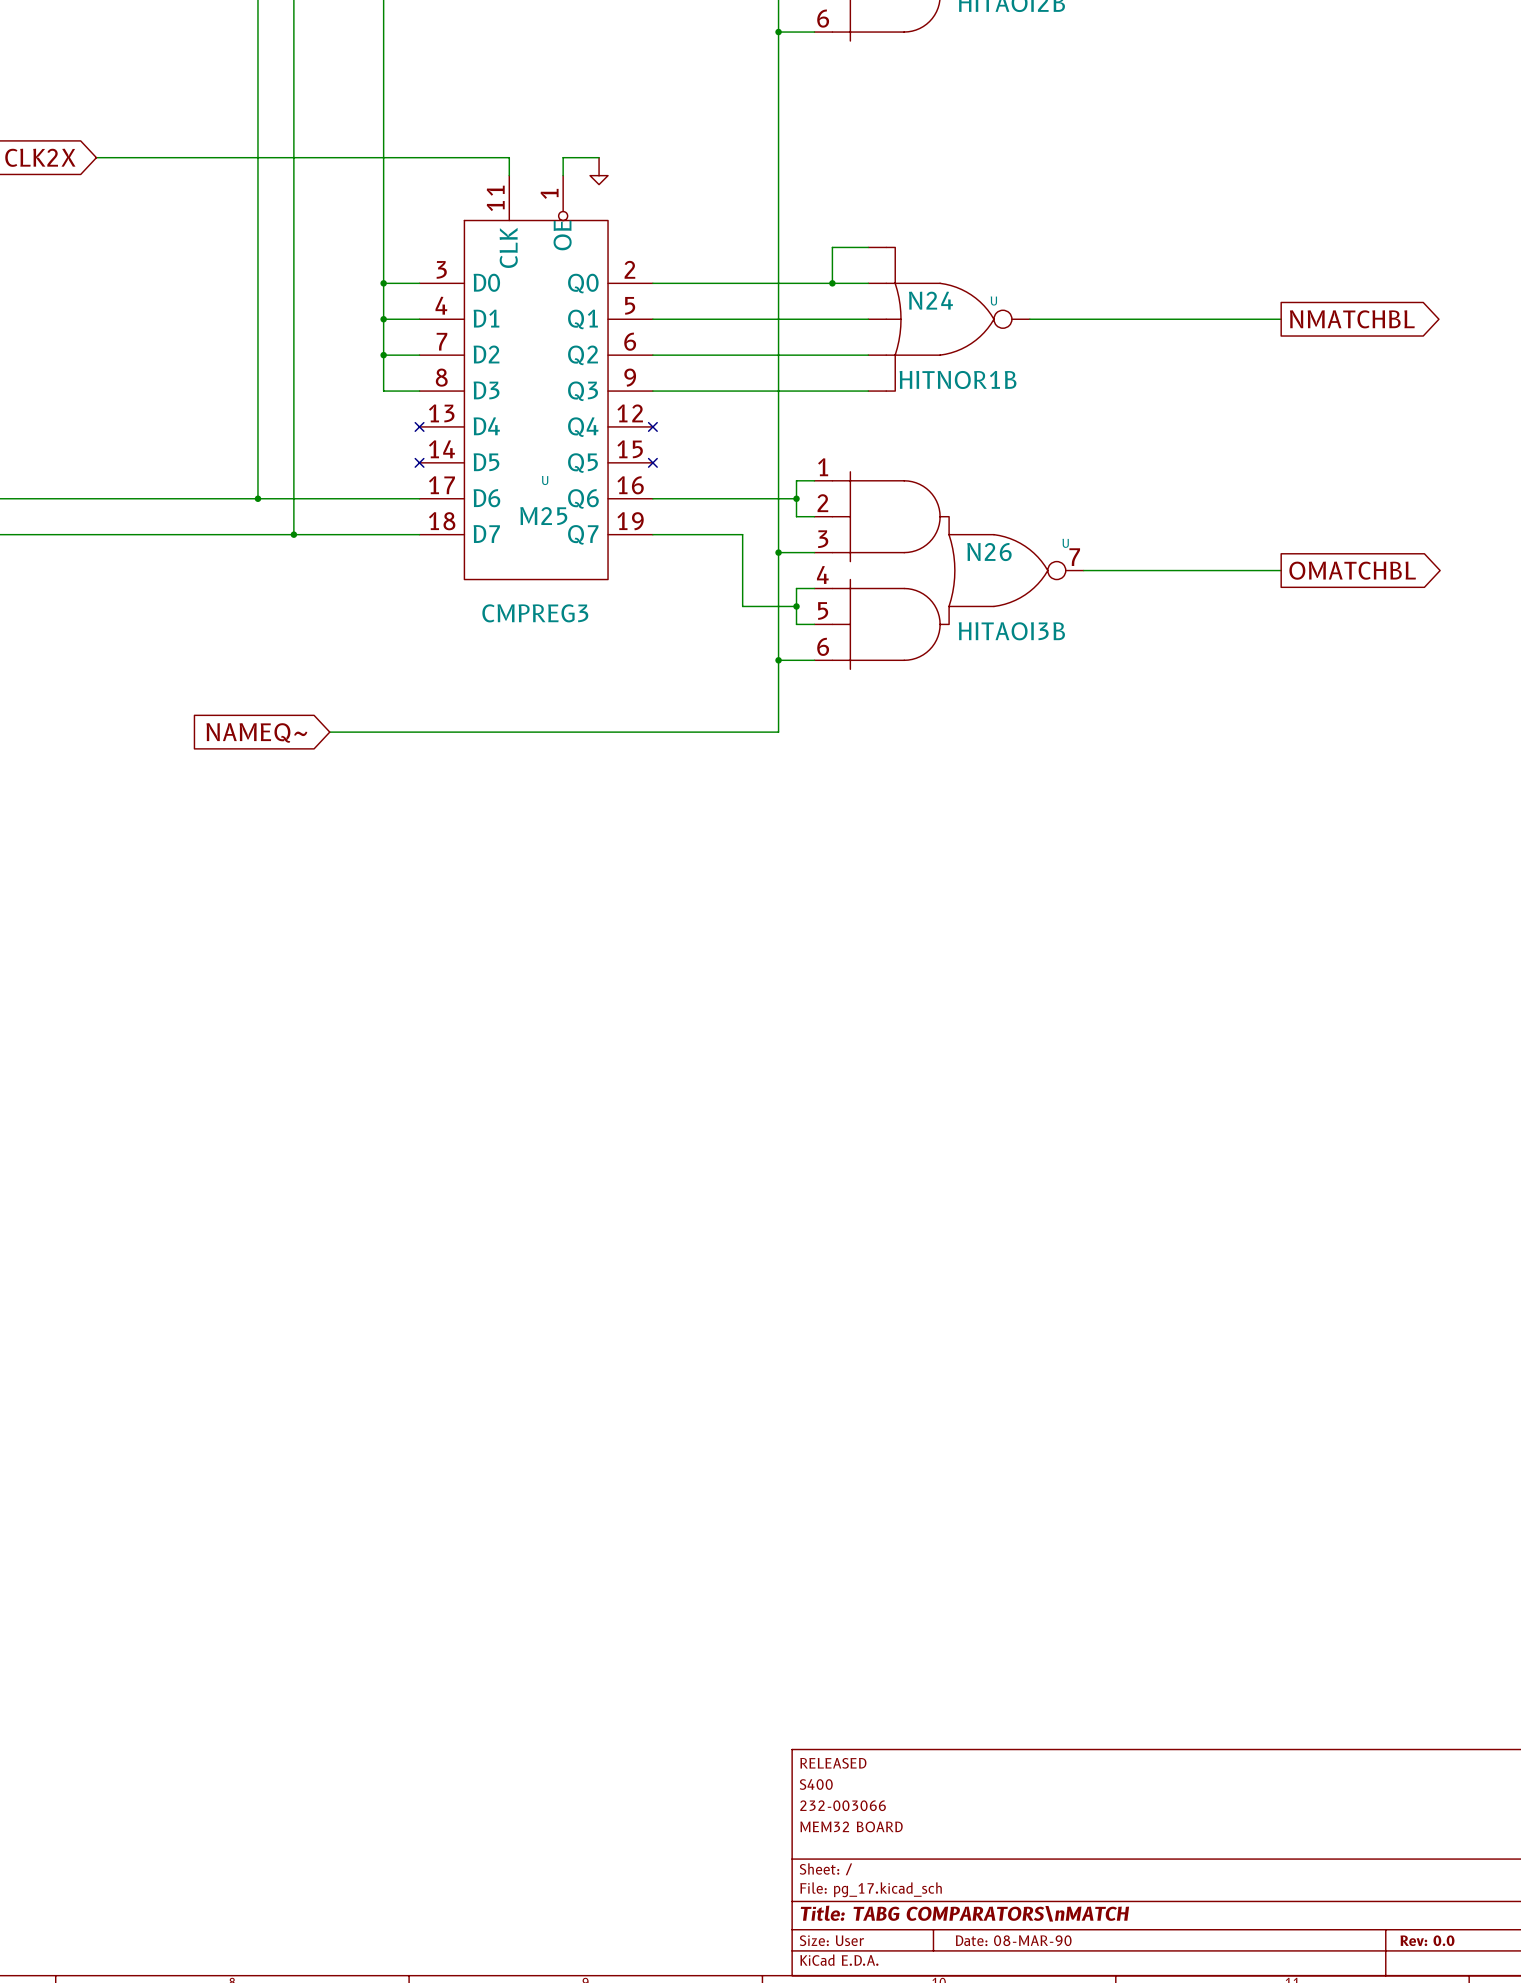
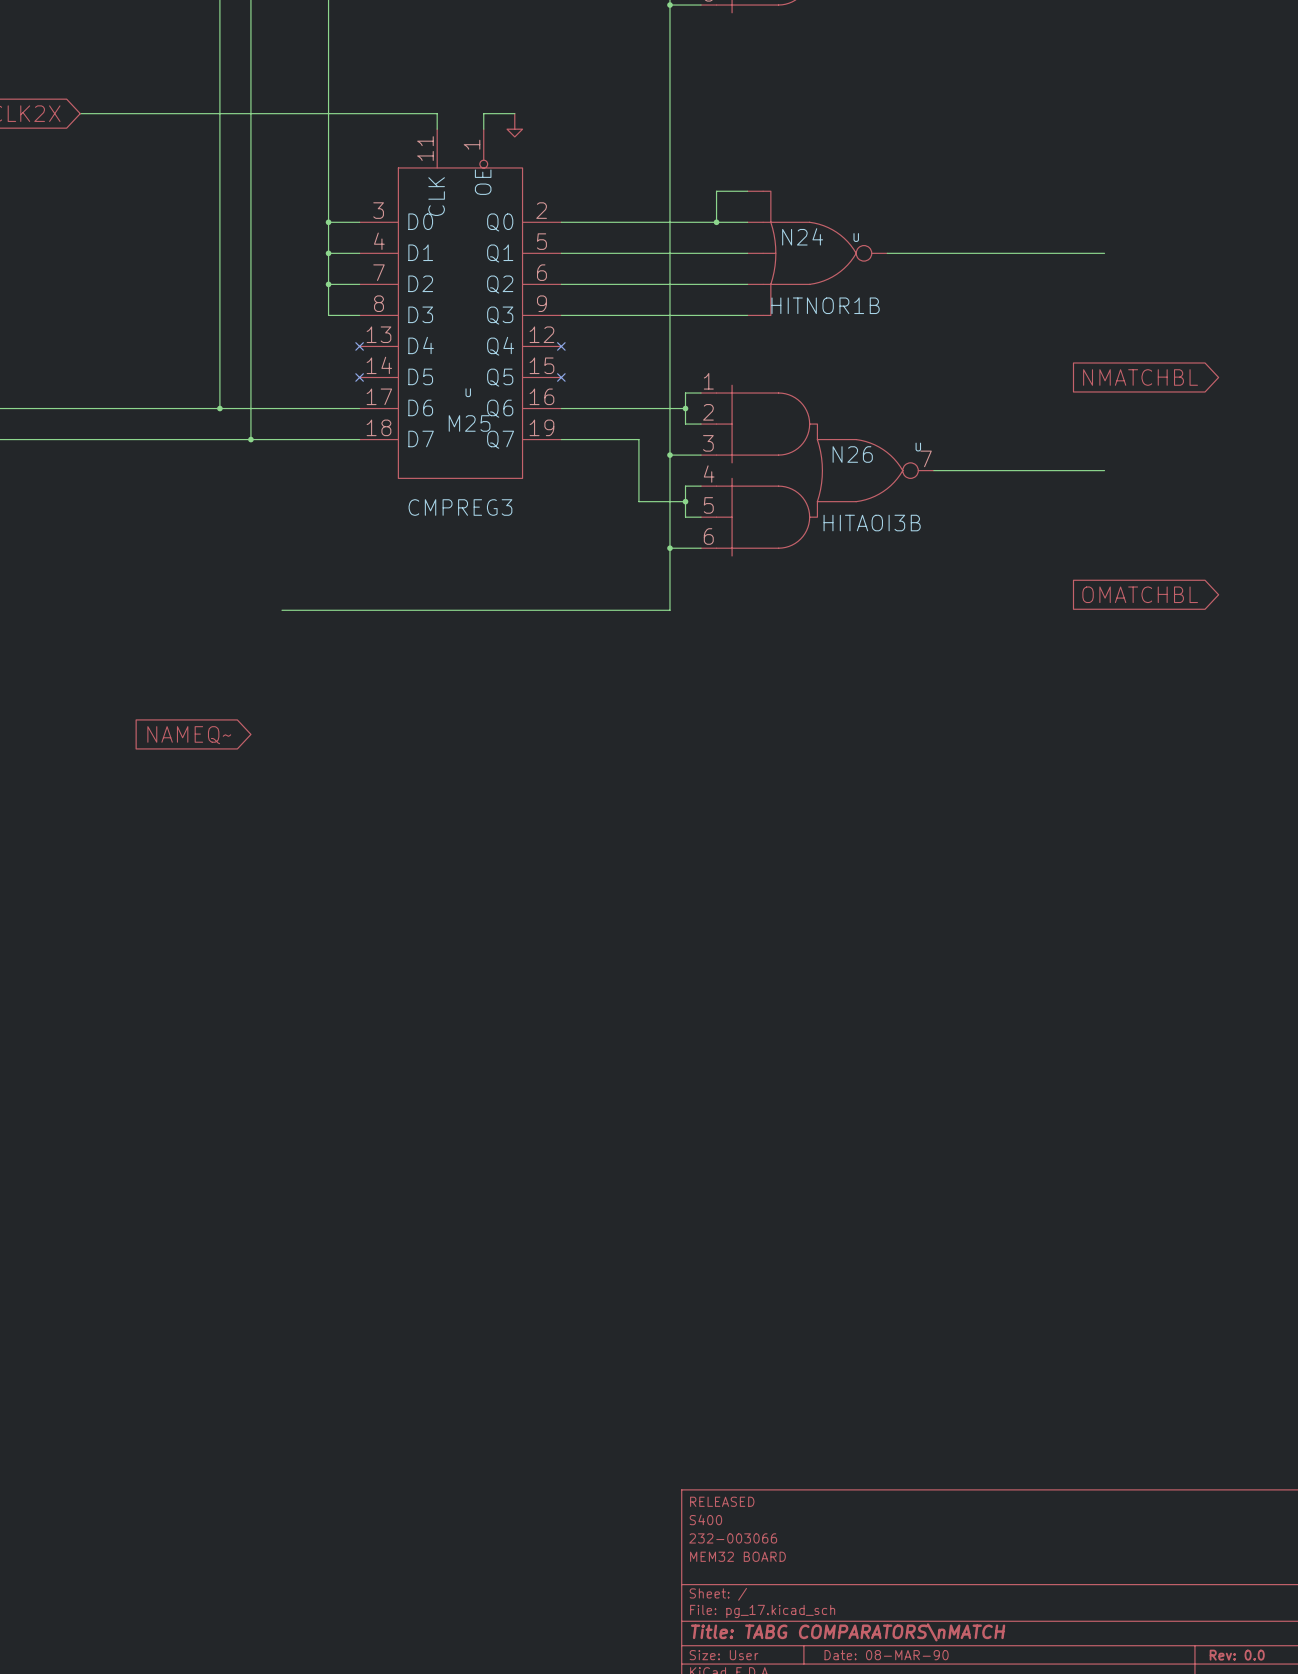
global label position: NMATCHBL (1352, 319) -> NMATCHBL (1140, 377)
global label position: OMATCHBL (1352, 570) -> OMATCHBL (1140, 594)
global label position: NAMEQ~ (256, 732) -> NAMEQ~ (189, 735)

